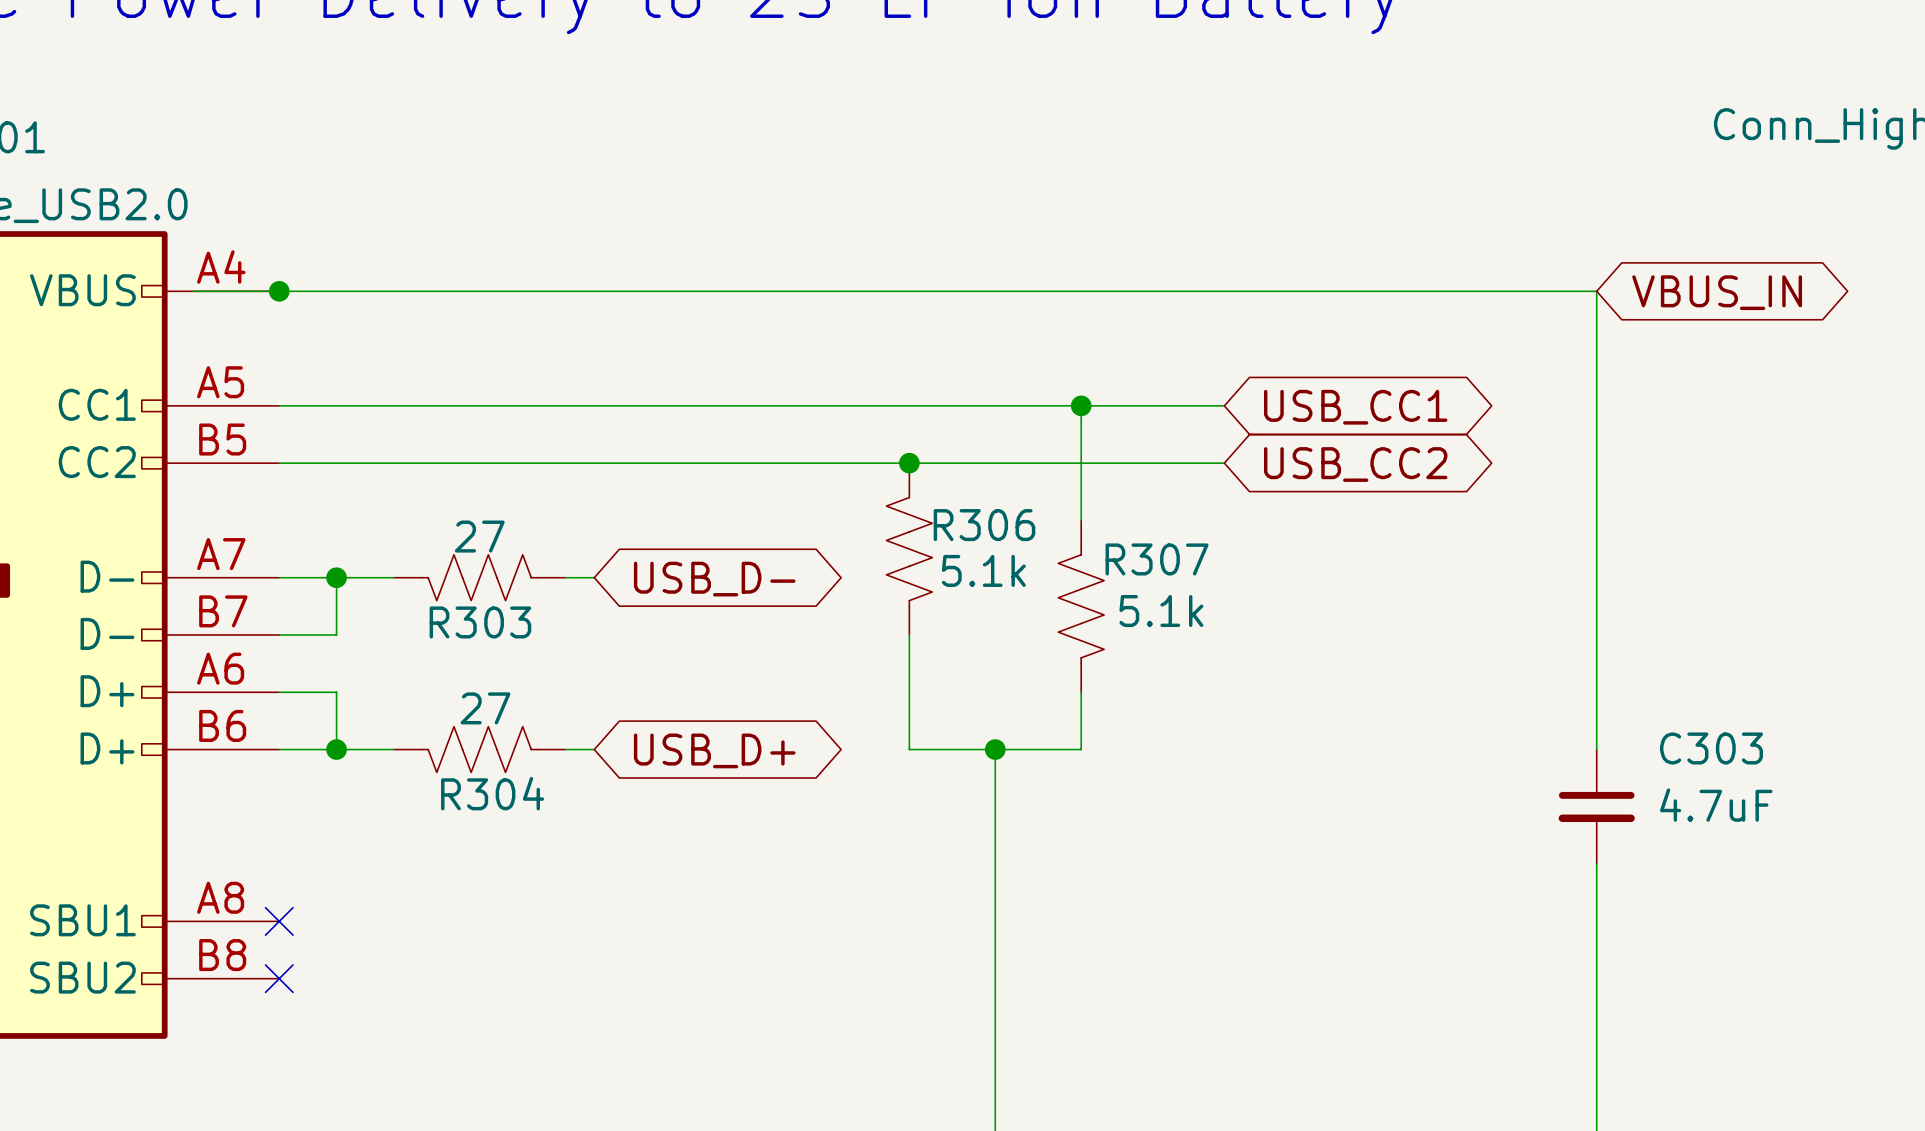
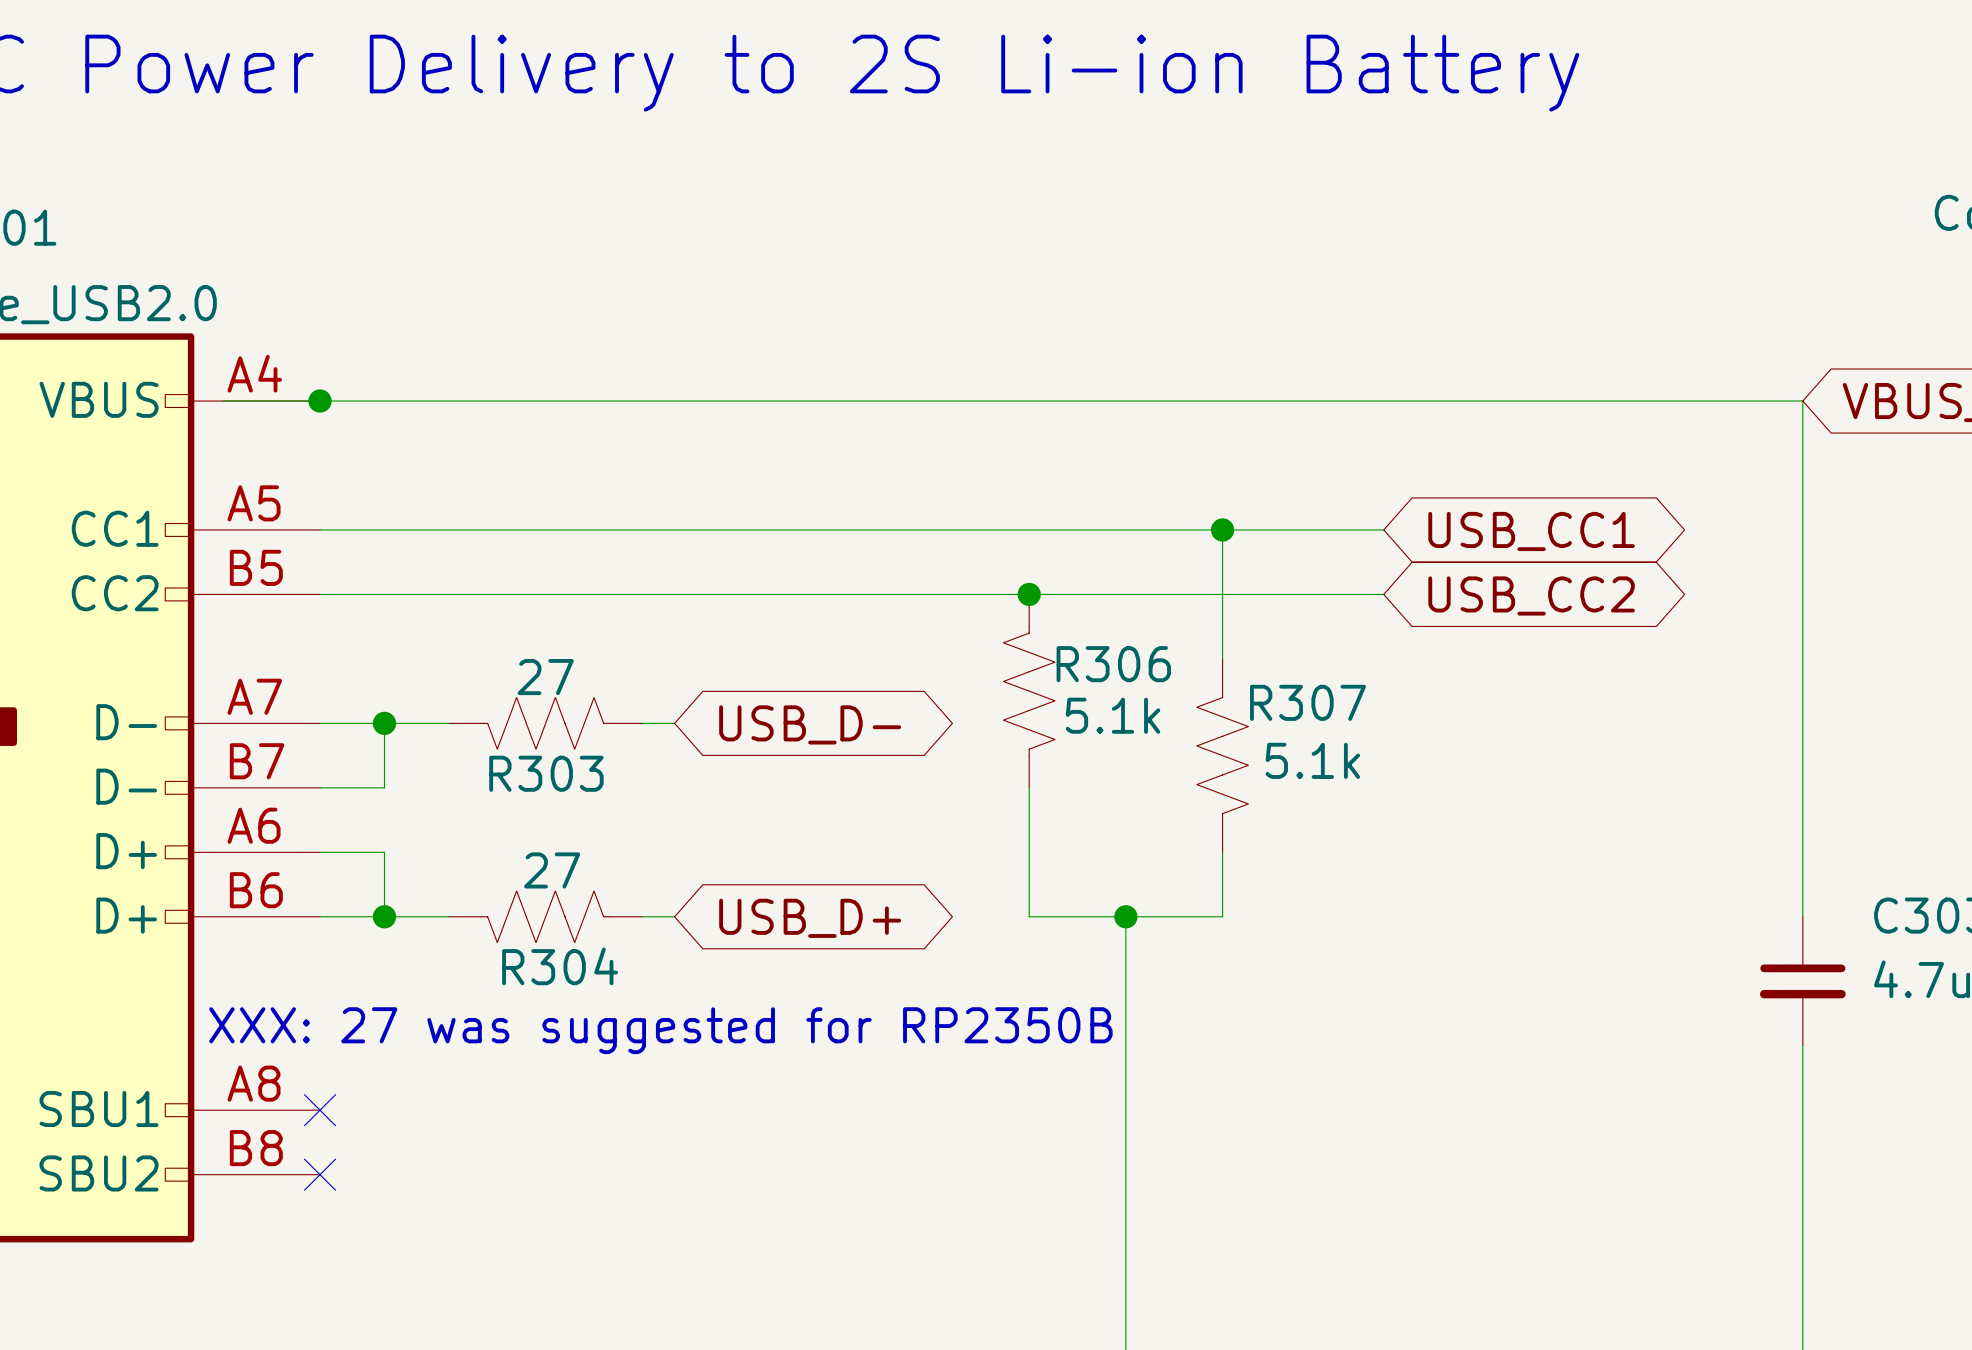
text: none -> XXX: 27 was suggested for RP2350B (660, 1030)

